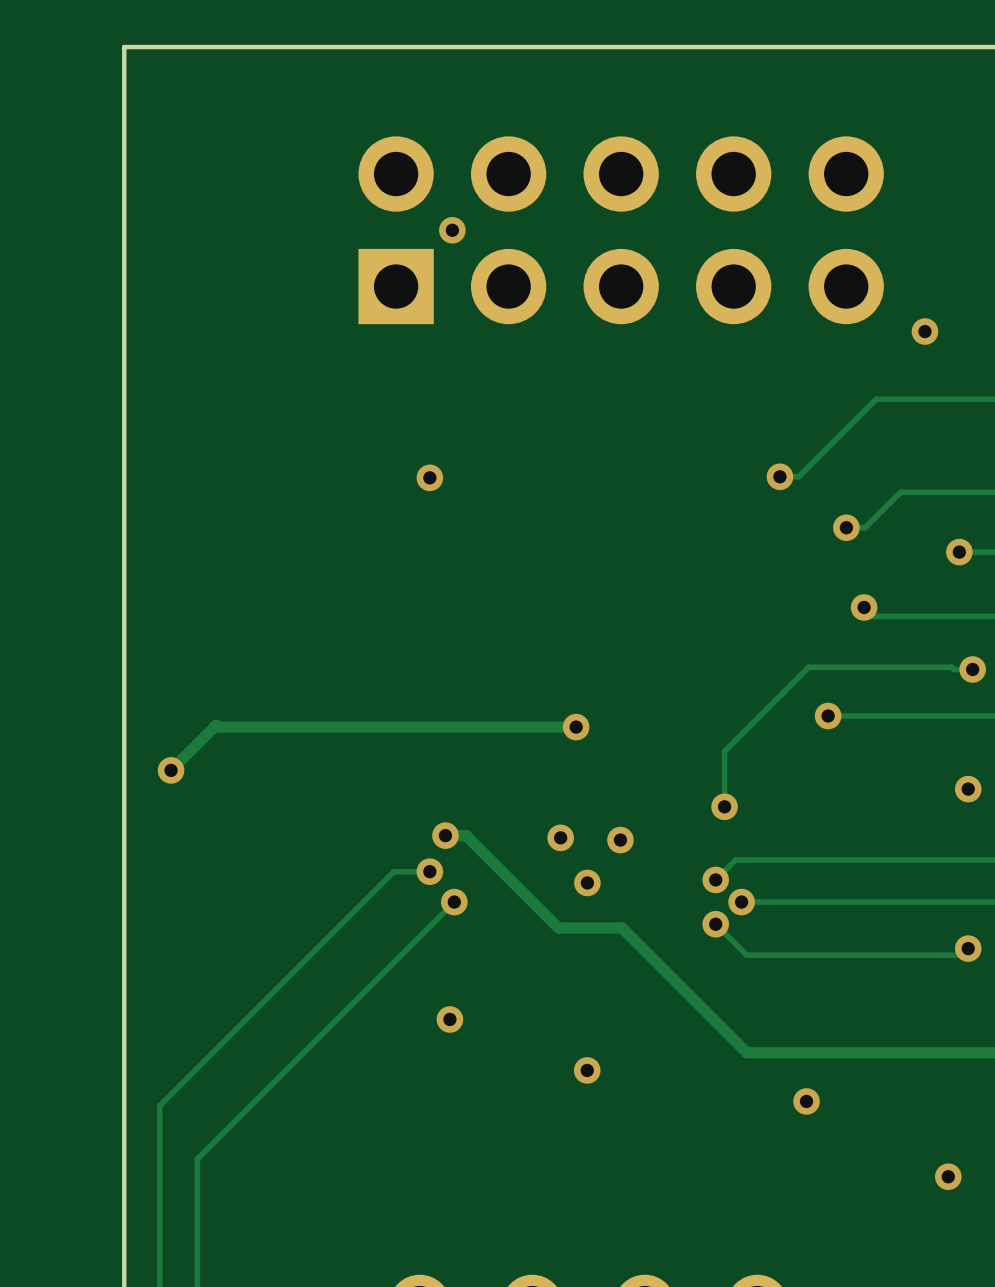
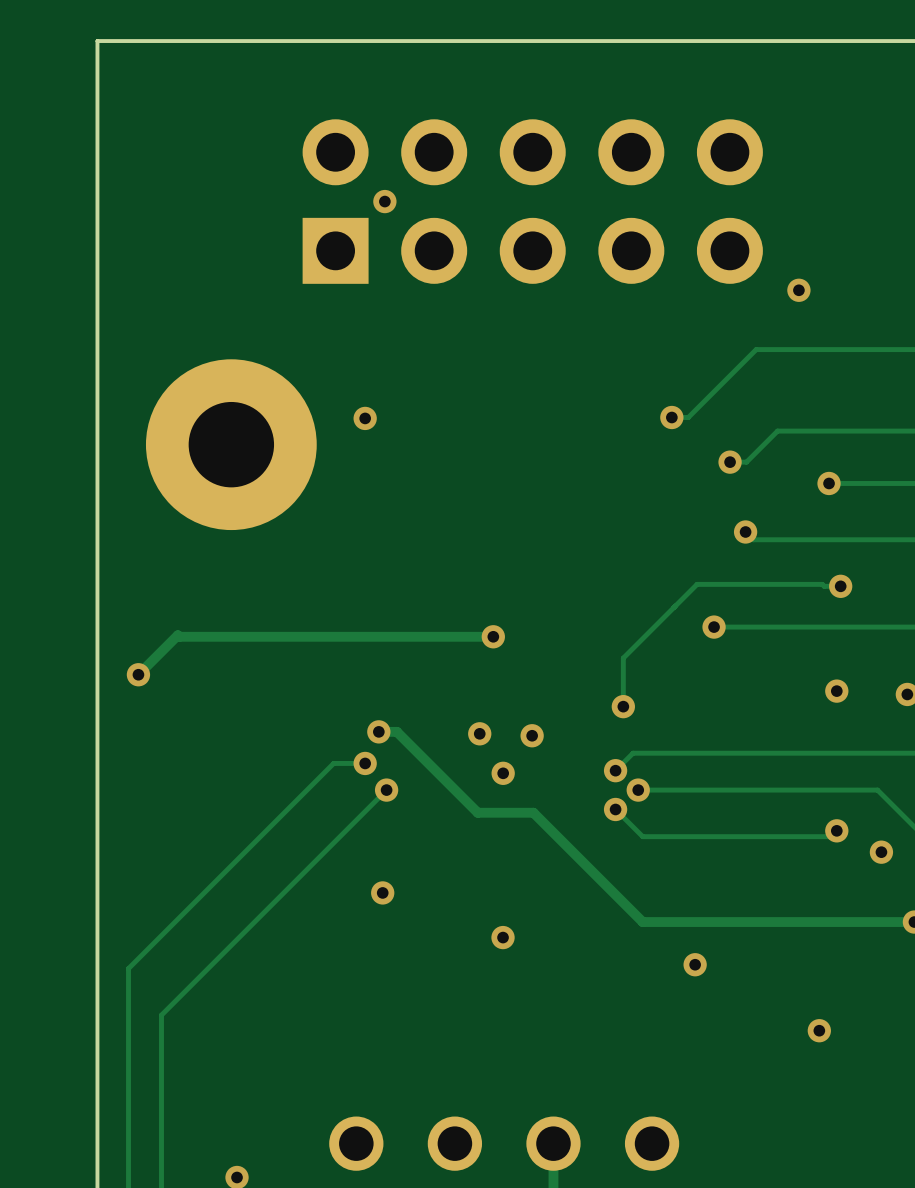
part: none -> (231, 444)

